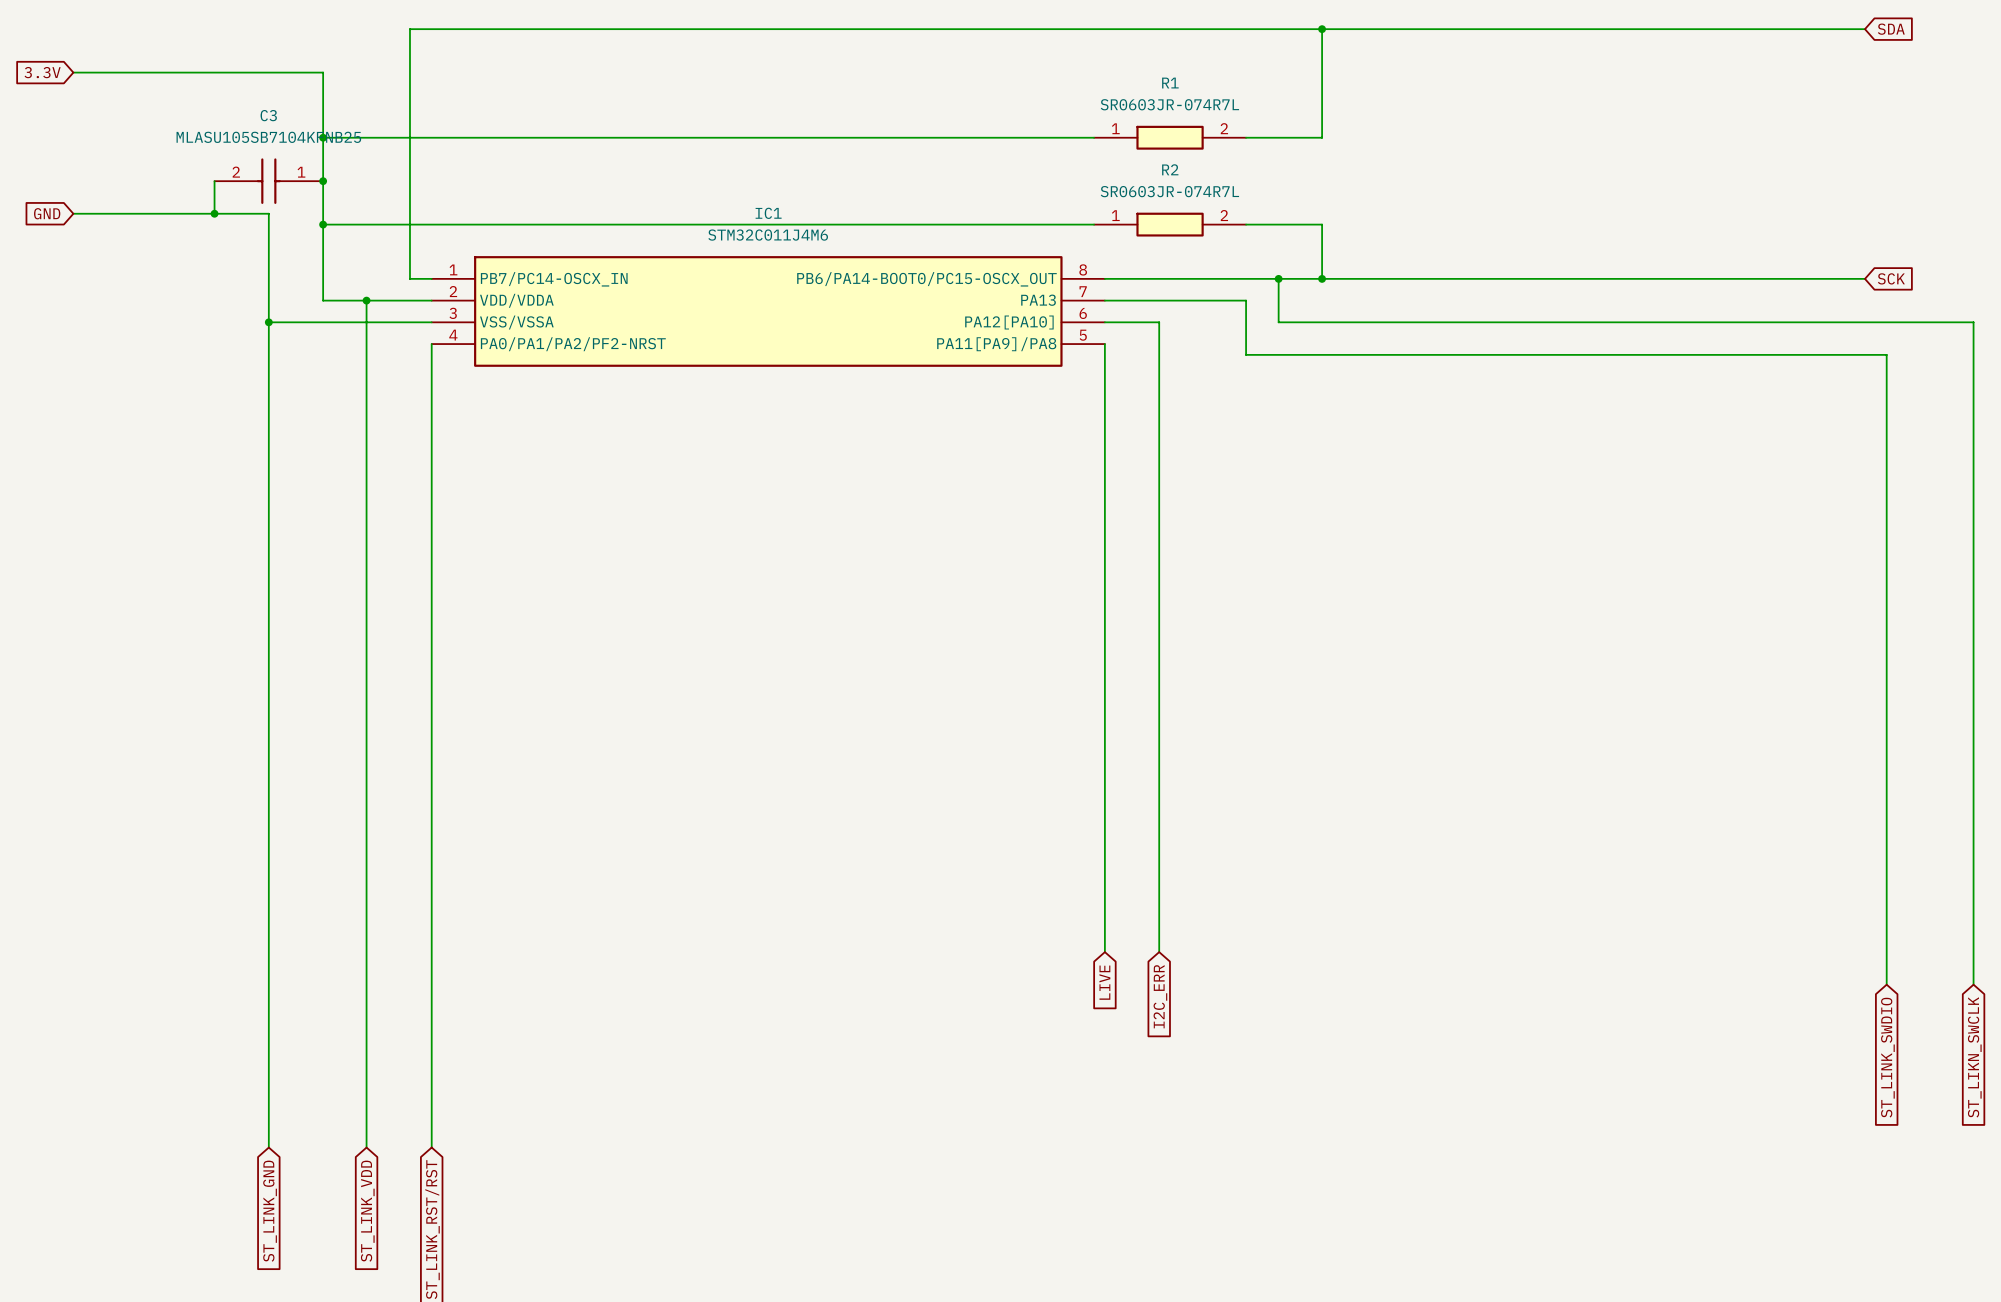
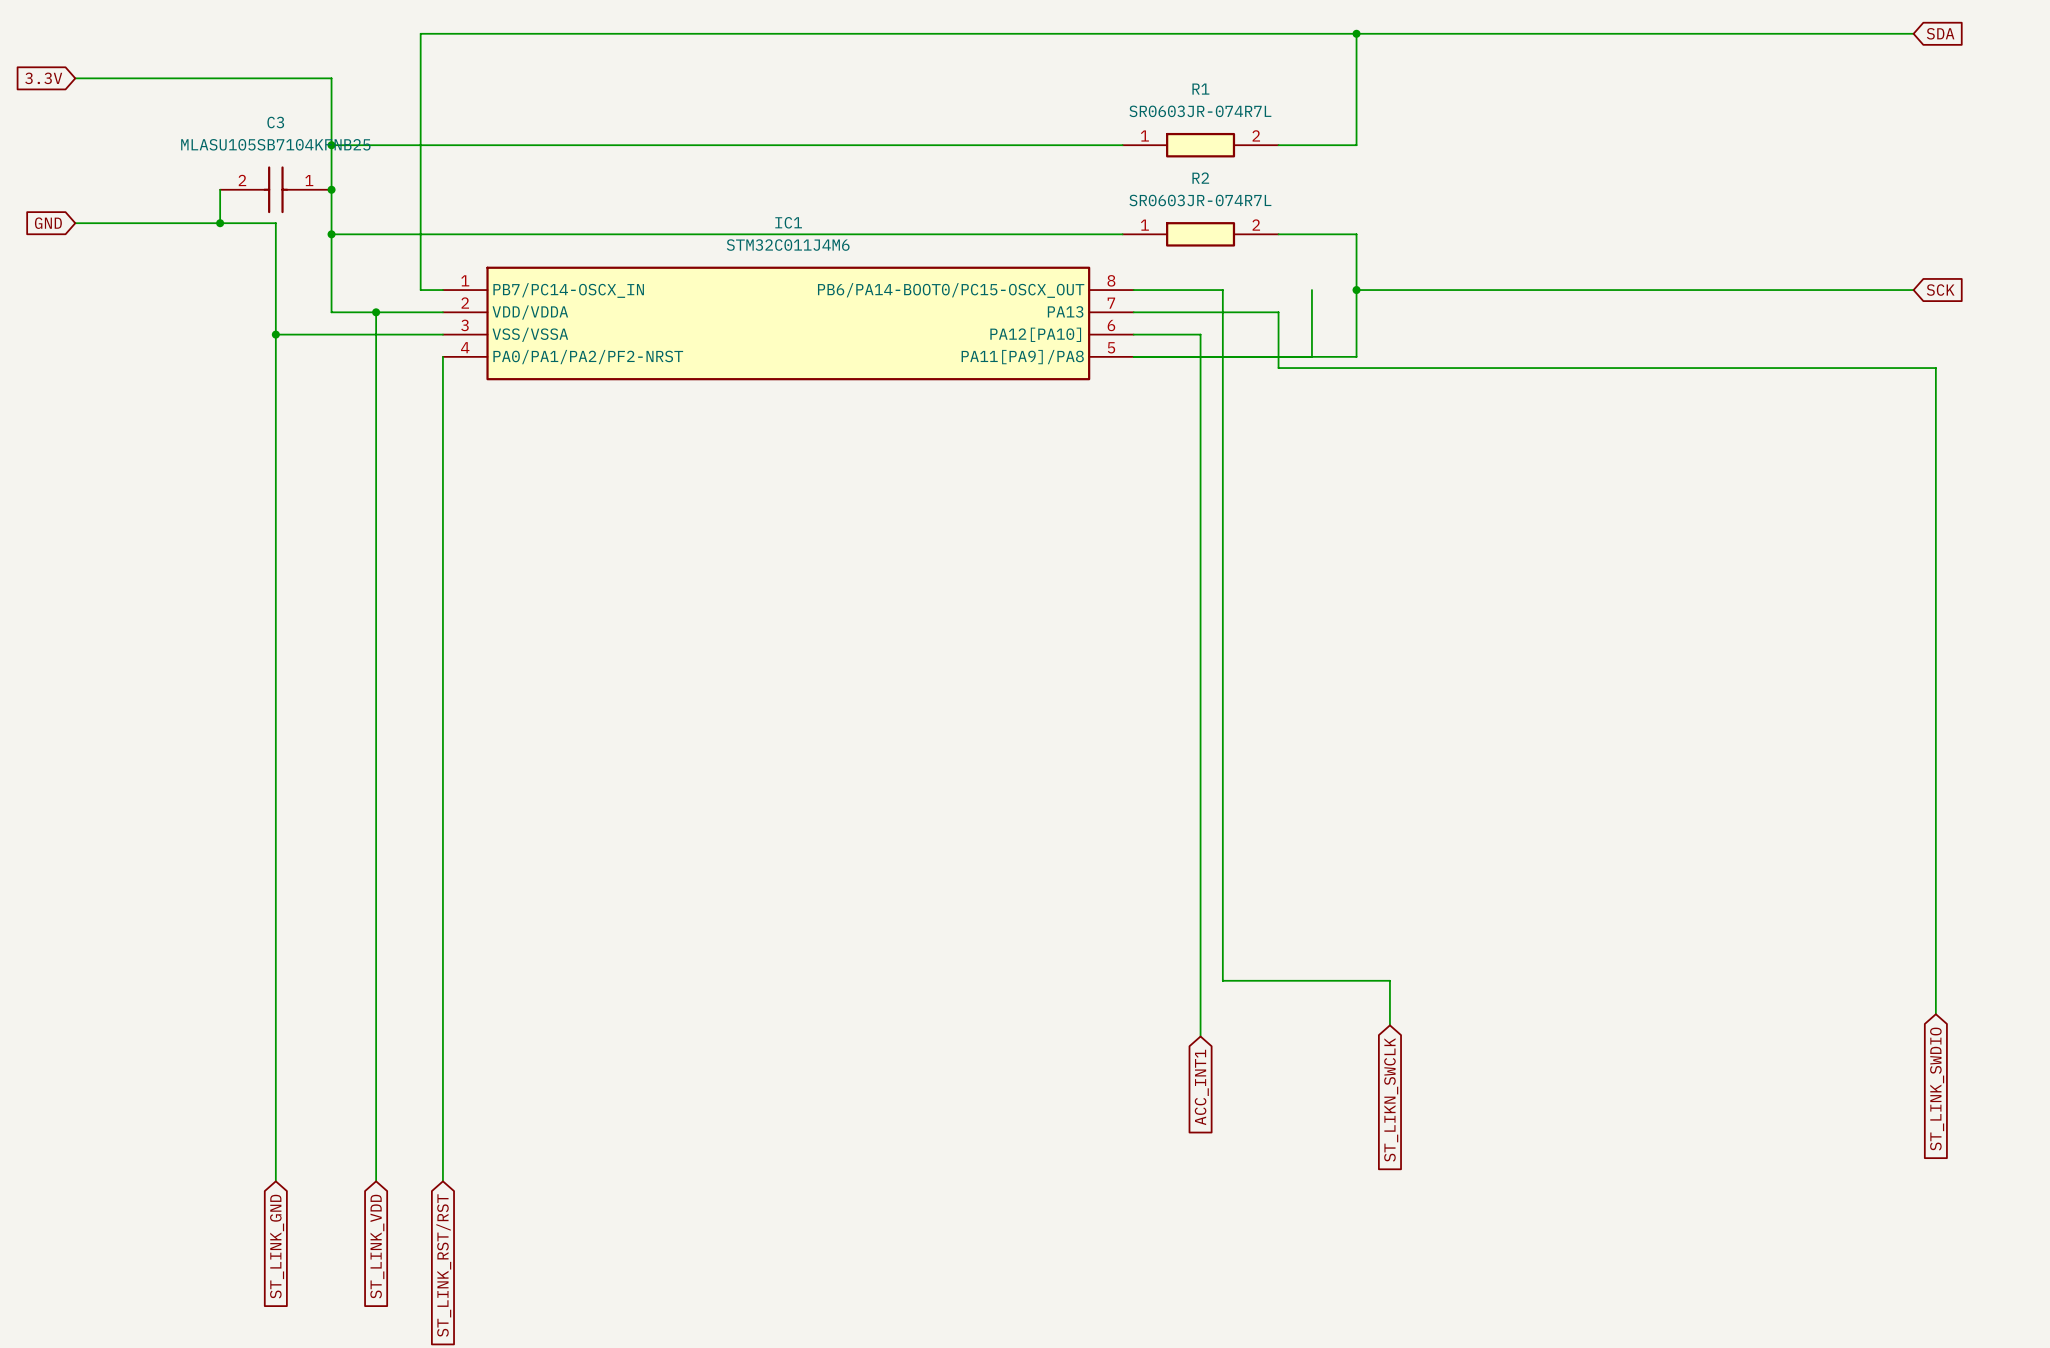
wire: (1191, 278) (1322, 278) -> (1133, 356) (1356, 356) (1356, 290)
wire: none -> (1222, 290) (1222, 980) (1389, 980) (1389, 1025)
junction: (1278, 278) -> none
wire: (1159, 322) (1159, 952) -> (1189, 334) (1200, 334) (1200, 1036)
wire: (1278, 322) (1973, 322) (1973, 984) -> (1311, 334) (1311, 356)
wire: (1104, 344) (1104, 952) -> none
global label: LIVE (1104, 982) -> none
global label: I2C_ERR (1160, 996) -> none
global label: none -> ACC_INT1 (1201, 1087)
global label: ST_LIKN_SWCLK (1974, 1057) -> none
global label: none -> ST_LIKN_SWCLK (1391, 1099)

